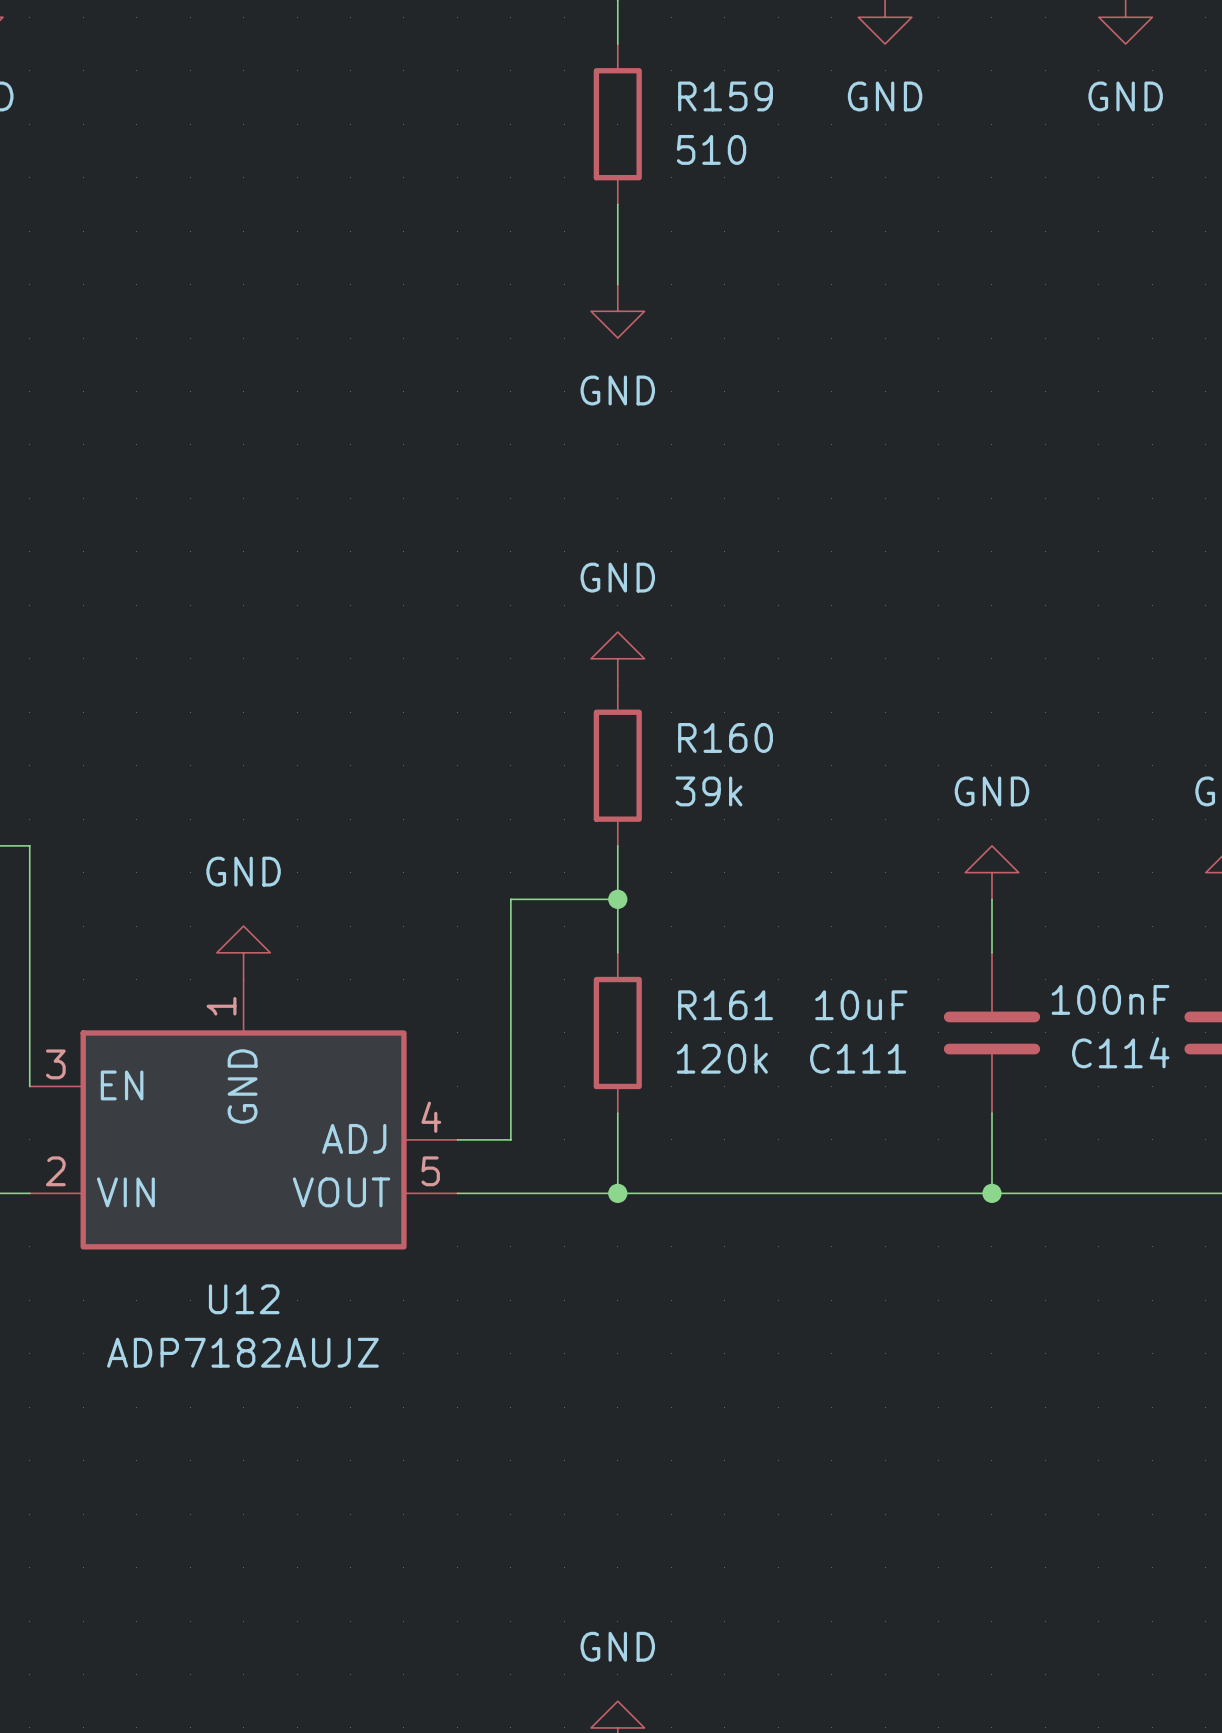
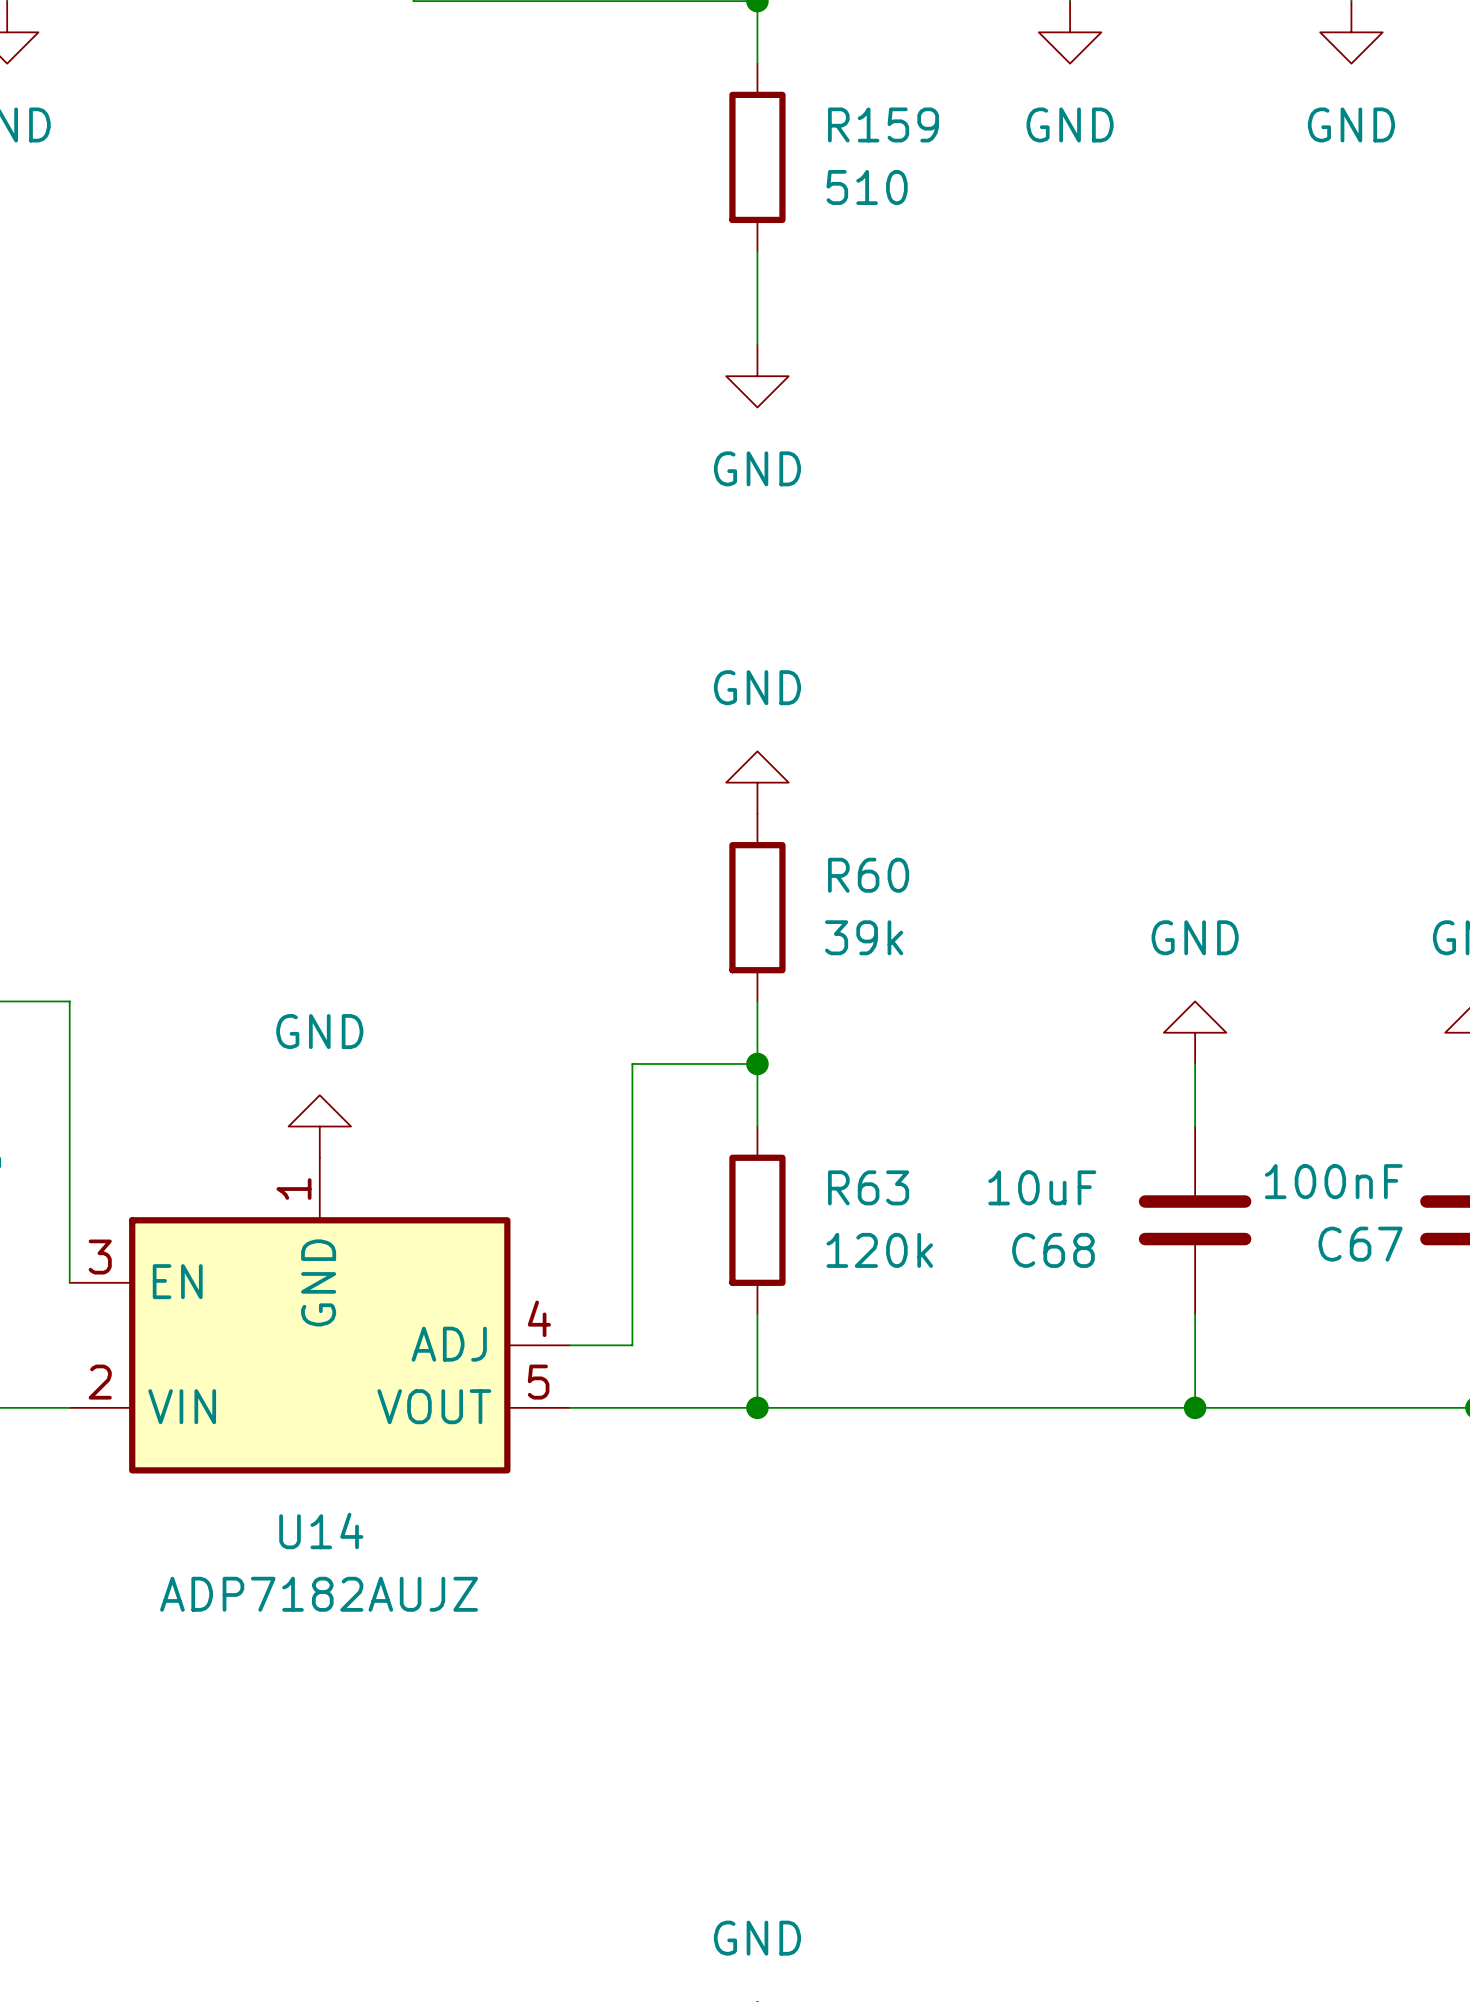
R160 name: R160 (725, 737) -> R60 (868, 875)
R161 name: R161 (725, 1005) -> R63 (868, 1187)
C114 name: C114 (1120, 1052) -> C67 (1360, 1244)
C111 name: C111 (858, 1058) -> C68 (1053, 1250)
U12 name: U12 (244, 1299) -> U14 (321, 1531)

